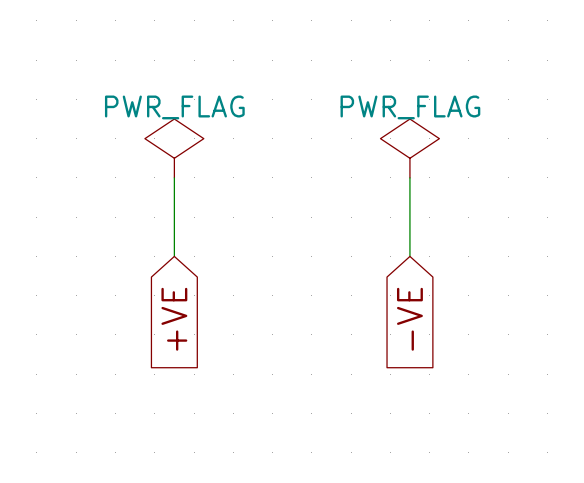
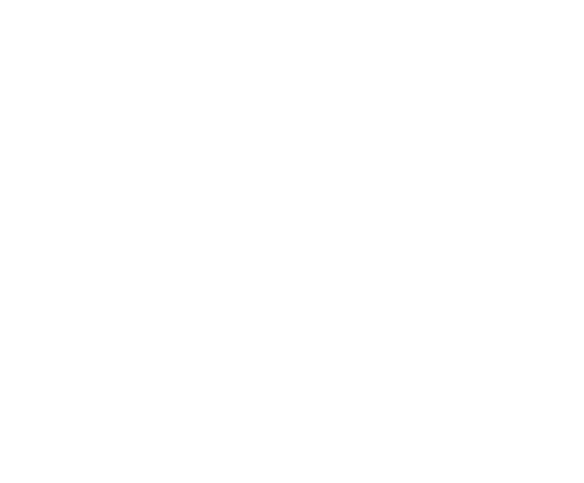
power symbol: PWR_FLAG (174, 148) -> none
power symbol: PWR_FLAG (409, 148) -> none
wire: (174, 177) (174, 256) -> none
wire: (409, 177) (409, 256) -> none
global label: +VE (174, 319) -> none
global label: -VE (409, 319) -> none

